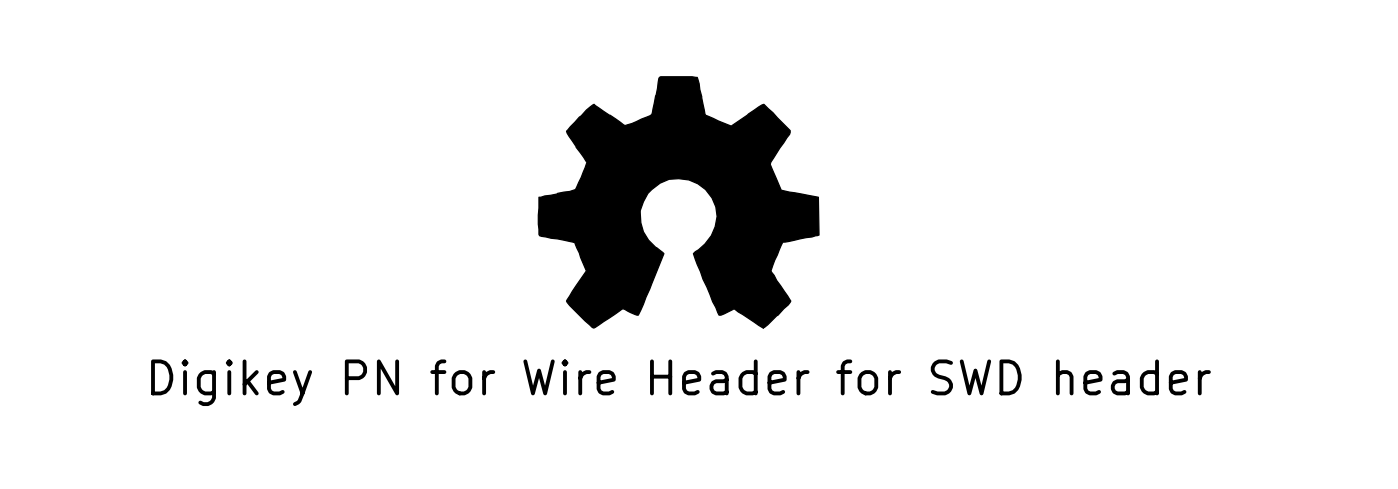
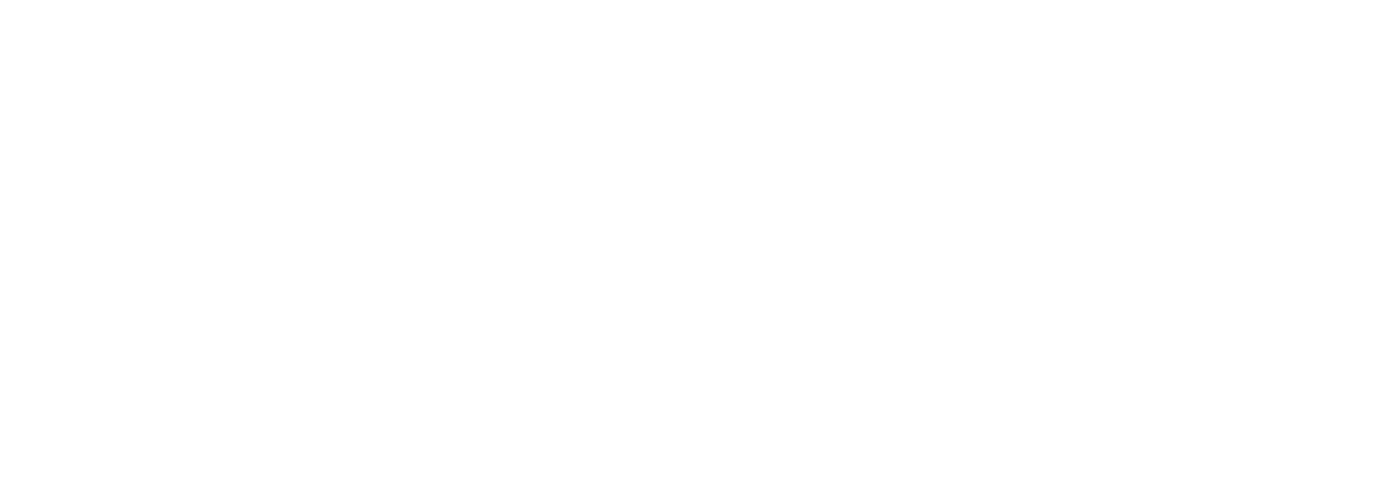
power symbol: (678, 202) -> none

